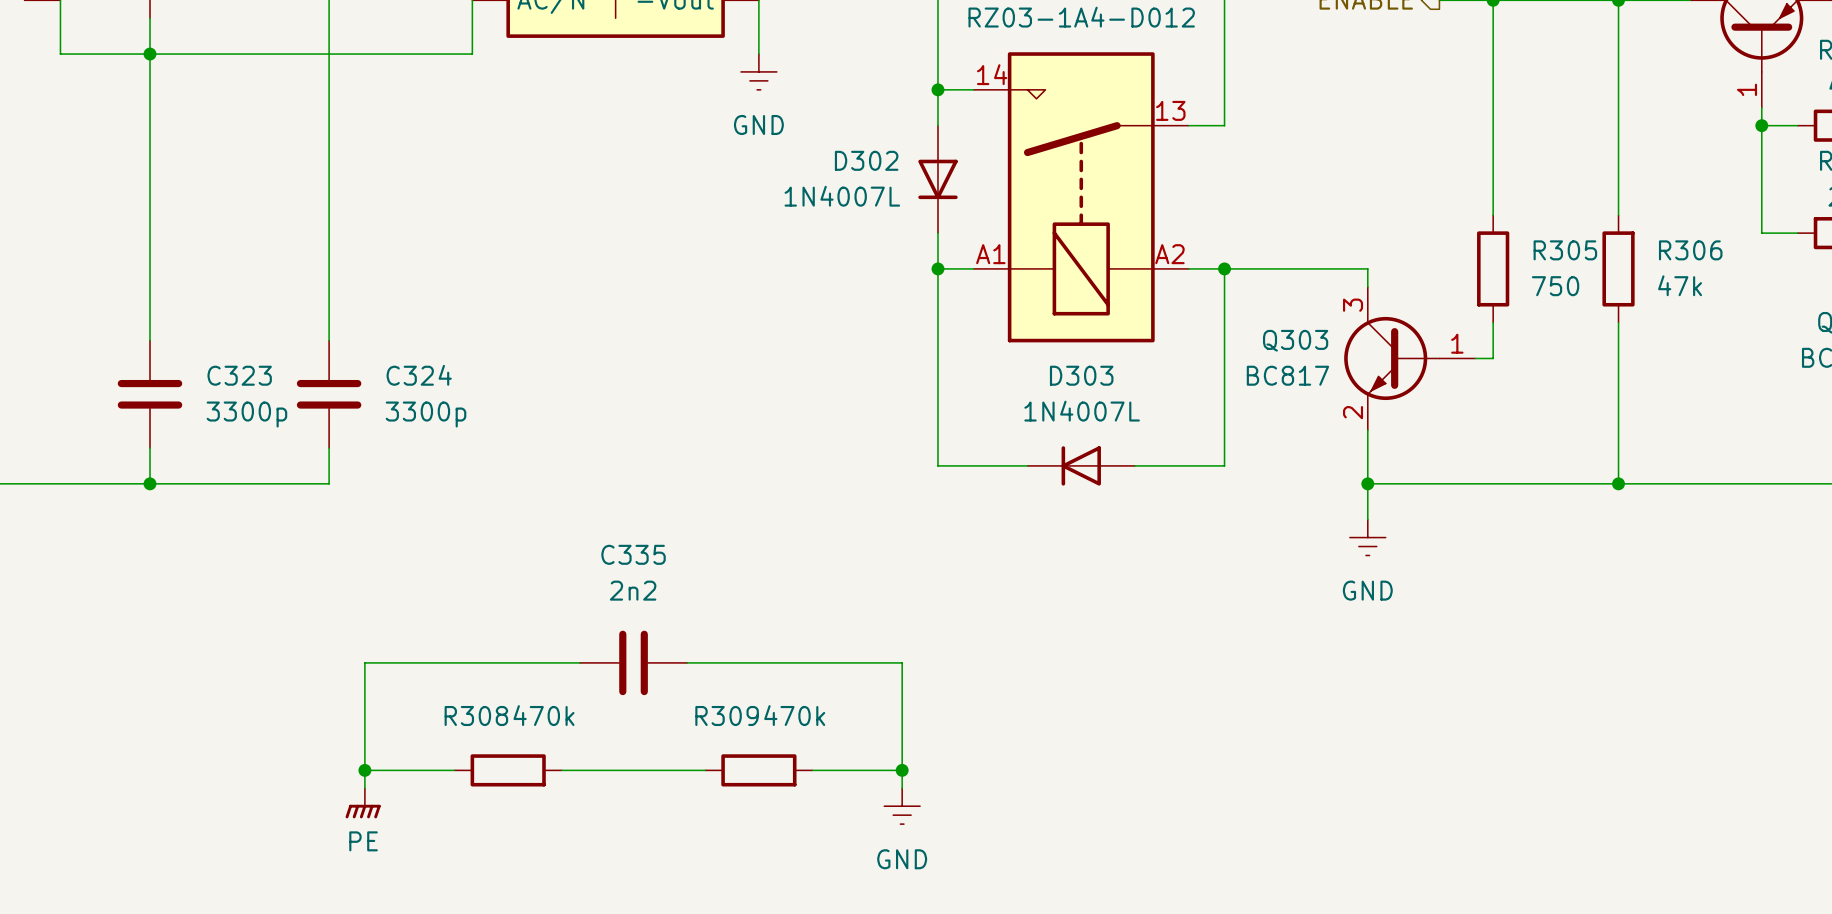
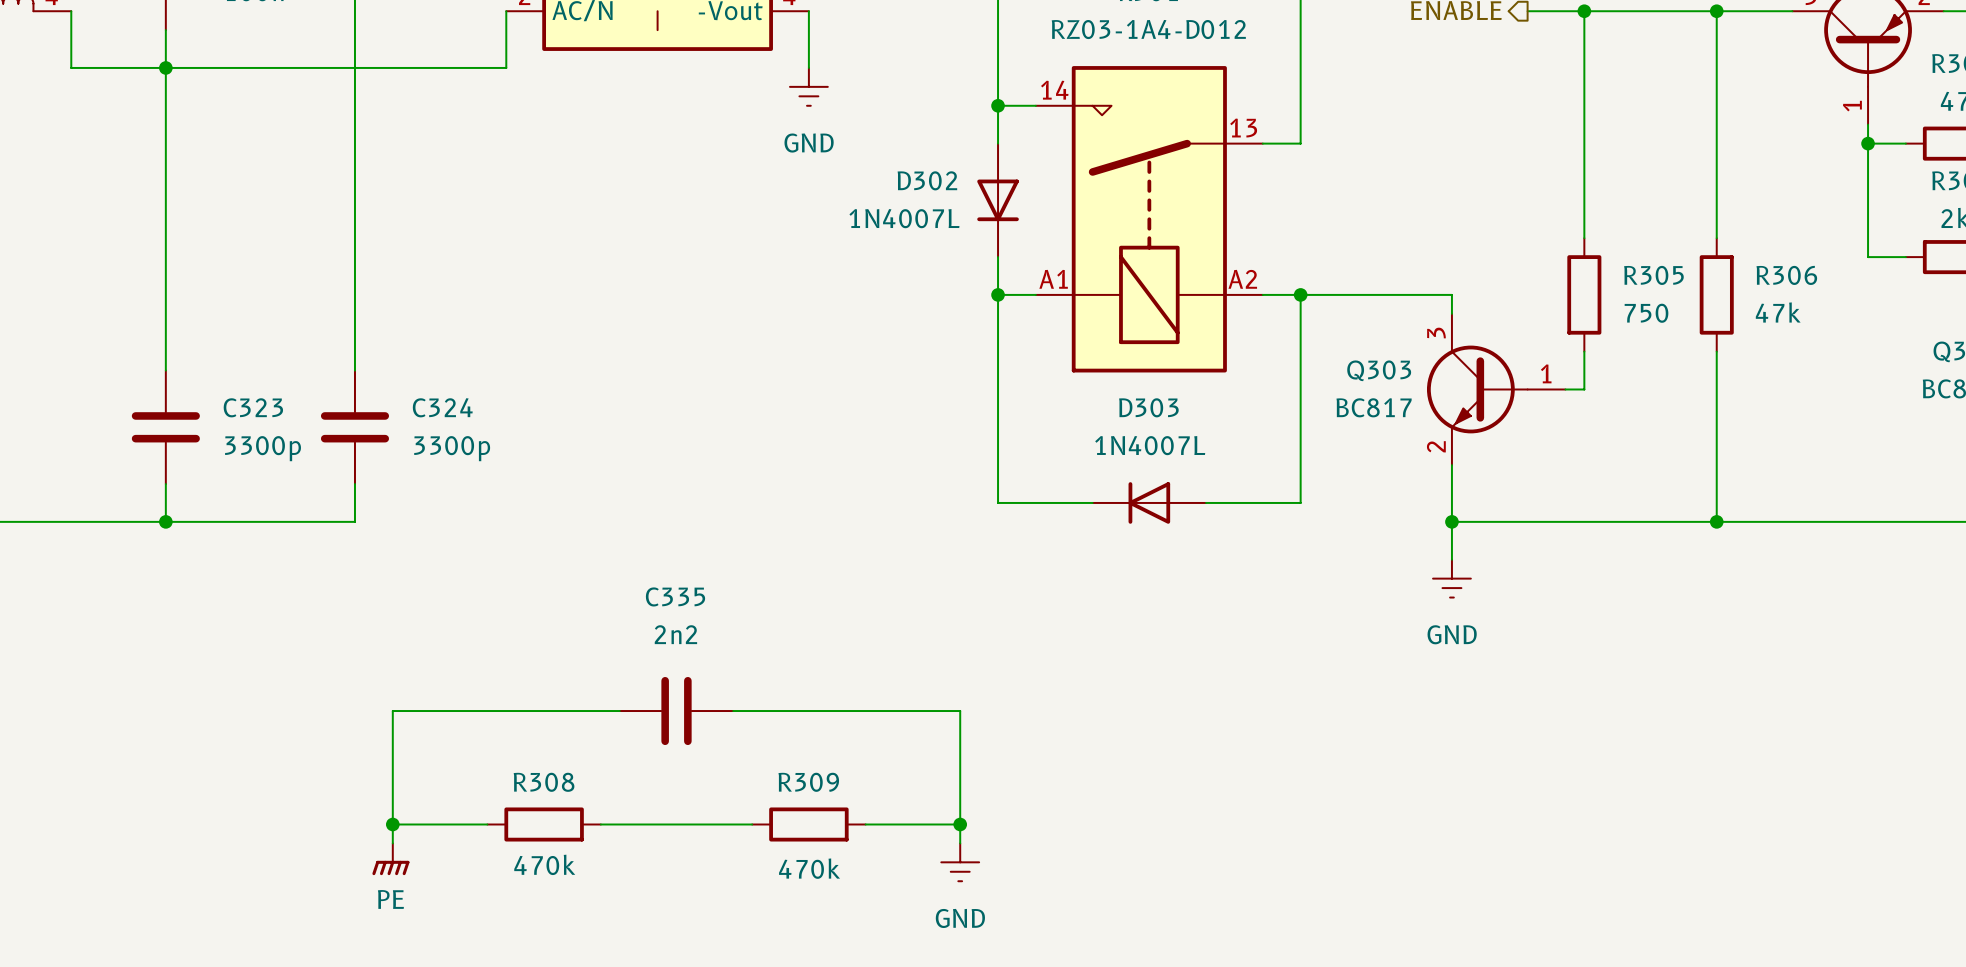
R308 name position: R308 (476, 715) -> R308 (544, 782)
R308 value position: 470k (543, 715) -> 470k (544, 864)
R309 name position: R309 (727, 715) -> R309 (808, 782)
R309 value position: 470k (794, 715) -> 470k (809, 868)

